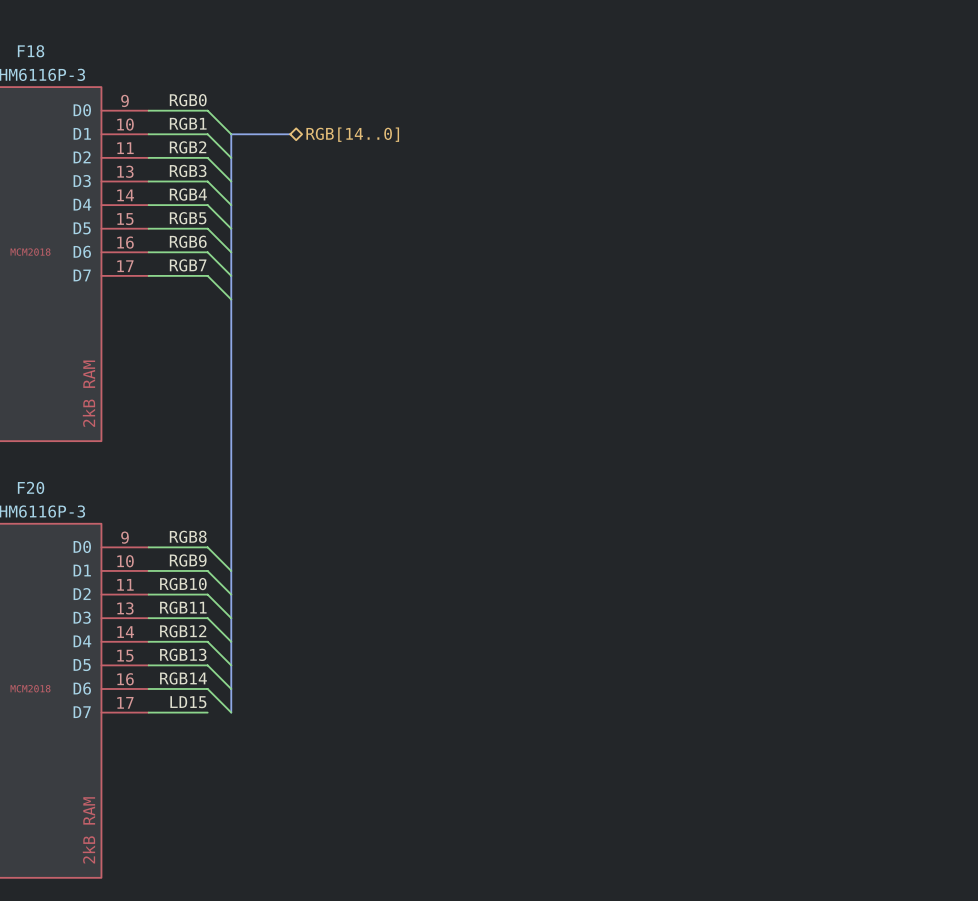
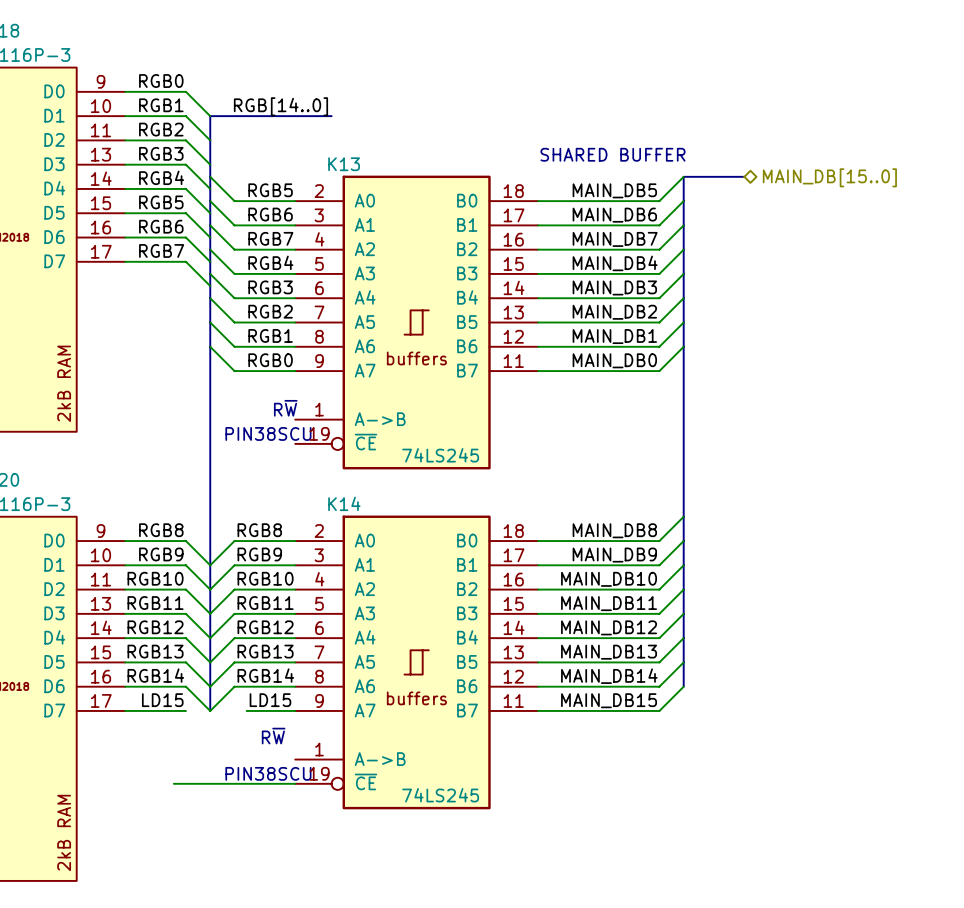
label: none -> RGB[14..0] (280, 106)
bus: none -> (270, 116) (331, 116)
hierarchical label: RGB[14..0] (352, 134) -> none
text: none -> SHARED BUFFER (612, 154)
wire: none -> (210, 176) (234, 201) (295, 201)
wire: none -> (683, 176) (659, 201) (538, 201)
bus: none -> (744, 176) (683, 176) (683, 686)
hierarchical label: none -> MAIN_DB[15..0] (829, 177)
label: none -> RGB5 (270, 190)
label: none -> MAIN_DB5 (614, 190)
wire: none -> (210, 201) (234, 225) (295, 225)
wire: none -> (683, 201) (659, 225) (538, 225)
label: none -> RGB6 (270, 214)
label: none -> MAIN_DB6 (614, 215)
wire: none -> (210, 225) (234, 249) (295, 249)
wire: none -> (683, 225) (659, 249) (538, 249)
label: none -> RGB7 (270, 238)
label: none -> MAIN_DB7 (615, 239)
wire: none -> (210, 249) (234, 273) (295, 273)
wire: none -> (683, 249) (659, 273) (538, 273)
label: none -> RGB4 (270, 262)
label: none -> MAIN_DB4 (615, 263)
wire: none -> (210, 273) (234, 298) (295, 298)
wire: none -> (683, 273) (659, 298) (538, 298)
label: none -> RGB3 (270, 287)
label: none -> MAIN_DB3 (614, 287)
wire: none -> (210, 298) (234, 322) (295, 322)
wire: none -> (683, 298) (659, 322) (538, 322)
label: none -> RGB2 (270, 311)
label: none -> MAIN_DB2 (614, 312)
wire: none -> (210, 322) (234, 346) (295, 346)
K13: none -> 74LS245 (416, 322)
wire: none -> (683, 322) (659, 346) (538, 346)
label: none -> RGB1 (270, 335)
label: none -> MAIN_DB1 (614, 336)
wire: none -> (210, 346) (234, 371) (295, 371)
wire: none -> (683, 346) (659, 371) (538, 371)
label: none -> RGB0 (270, 360)
label: none -> MAIN_DB0 (614, 360)
text: none -> R~{W} (285, 408)
text: none -> PIN38SCU (268, 433)
wire: none -> (683, 516) (659, 541) (538, 541)
label: none -> RGB8 (259, 530)
label: none -> MAIN_DB8 (614, 530)
wire: none -> (295, 541) (234, 541) (210, 565)
wire: none -> (683, 541) (659, 565) (538, 565)
label: none -> RGB9 (259, 554)
label: none -> MAIN_DB9 (614, 555)
wire: none -> (295, 565) (234, 565) (210, 589)
wire: none -> (683, 565) (659, 589) (538, 589)
label: none -> RGB10 (265, 578)
label: none -> MAIN_DB10 (609, 579)
wire: none -> (295, 589) (234, 589) (210, 613)
wire: none -> (683, 589) (659, 613) (538, 613)
label: none -> RGB11 (265, 603)
label: none -> MAIN_DB11 (609, 603)
wire: none -> (295, 613) (234, 613) (210, 638)
wire: none -> (683, 613) (659, 638) (538, 638)
label: none -> RGB12 (265, 627)
label: none -> MAIN_DB12 (609, 627)
wire: none -> (295, 638) (234, 638) (210, 662)
wire: none -> (683, 638) (659, 662) (538, 662)
label: none -> RGB13 (265, 651)
label: none -> MAIN_DB13 (609, 652)
wire: none -> (295, 662) (234, 662) (210, 686)
K14: none -> 74LS245 (416, 662)
wire: none -> (683, 662) (659, 686) (538, 686)
label: none -> RGB14 (265, 675)
label: none -> MAIN_DB14 (609, 676)
wire: none -> (295, 686) (234, 686) (210, 710)
wire: none -> (683, 686) (659, 710) (538, 710)
label: none -> LD15 (270, 700)
label: none -> MAIN_DB15 (609, 700)
wire: none -> (246, 710) (295, 710)
text: none -> R~{W} (273, 736)
text: none -> PIN38SCU (268, 773)
wire: none -> (173, 783) (295, 783)

